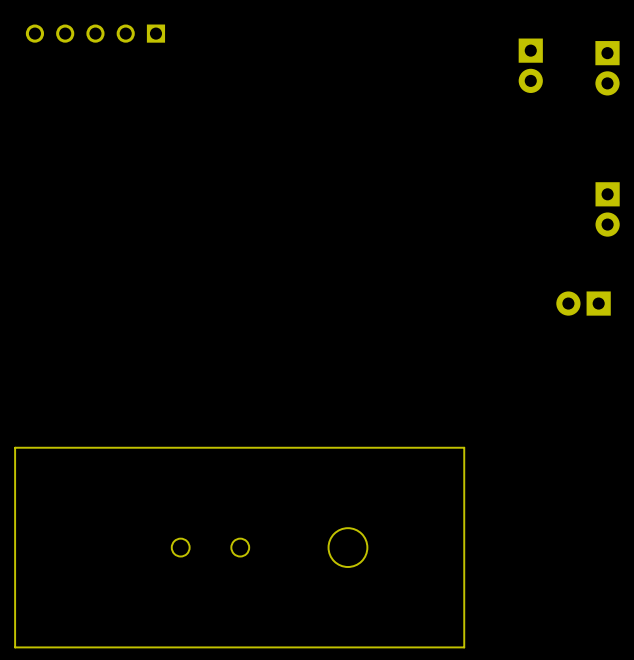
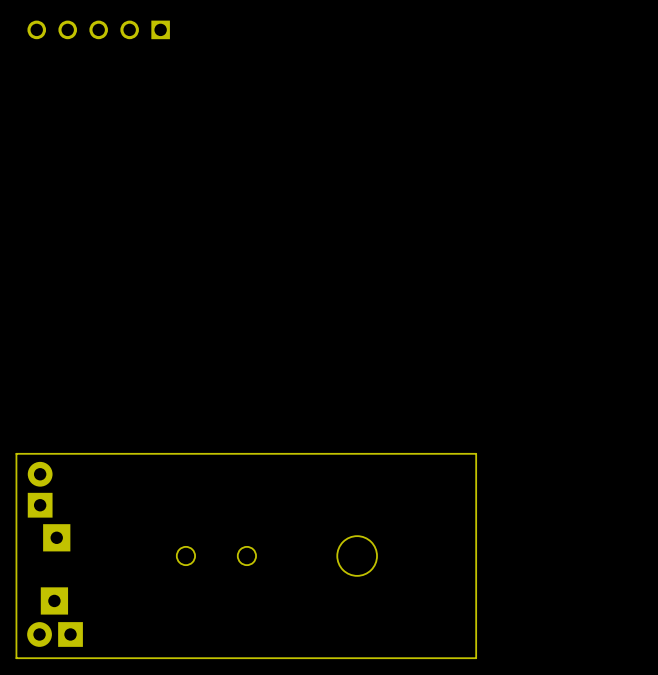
part: (530, 65) -> none
part: (607, 68) -> none
part: (607, 209) -> none
part: (583, 303) -> none
part: none -> (40, 489)
part: none -> (56, 537)
part: none -> (54, 600)
part: none -> (55, 634)

